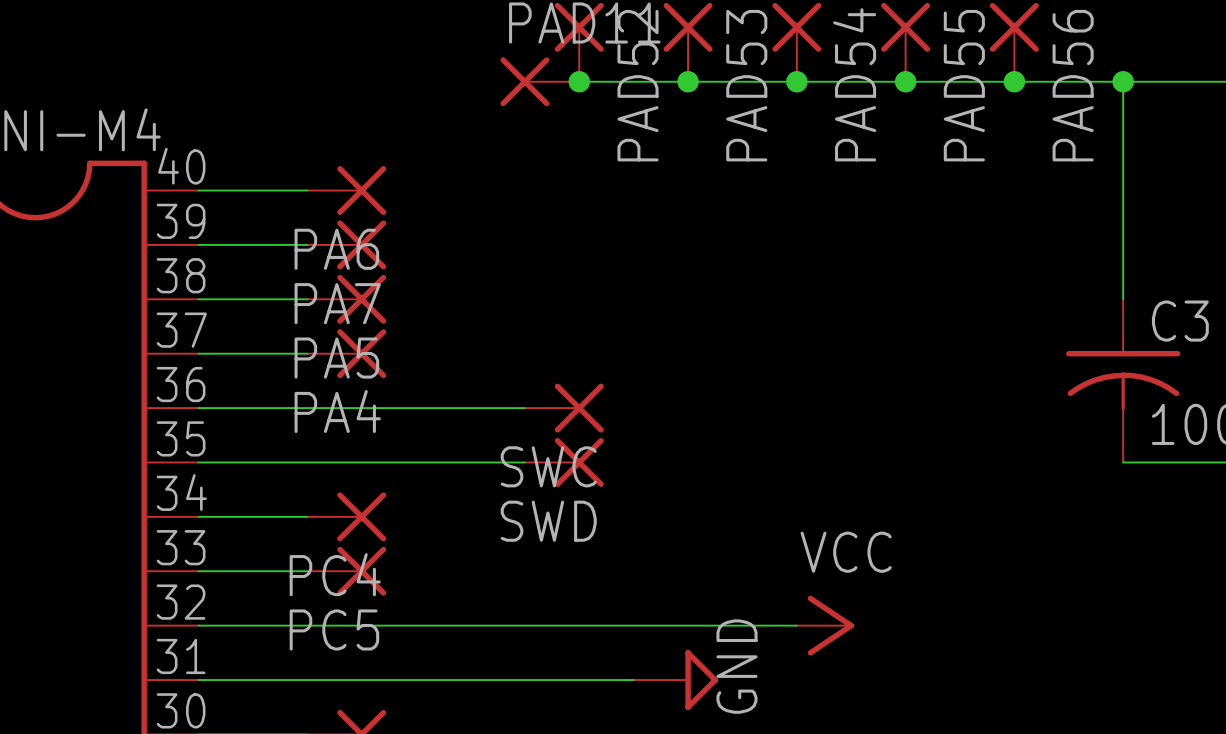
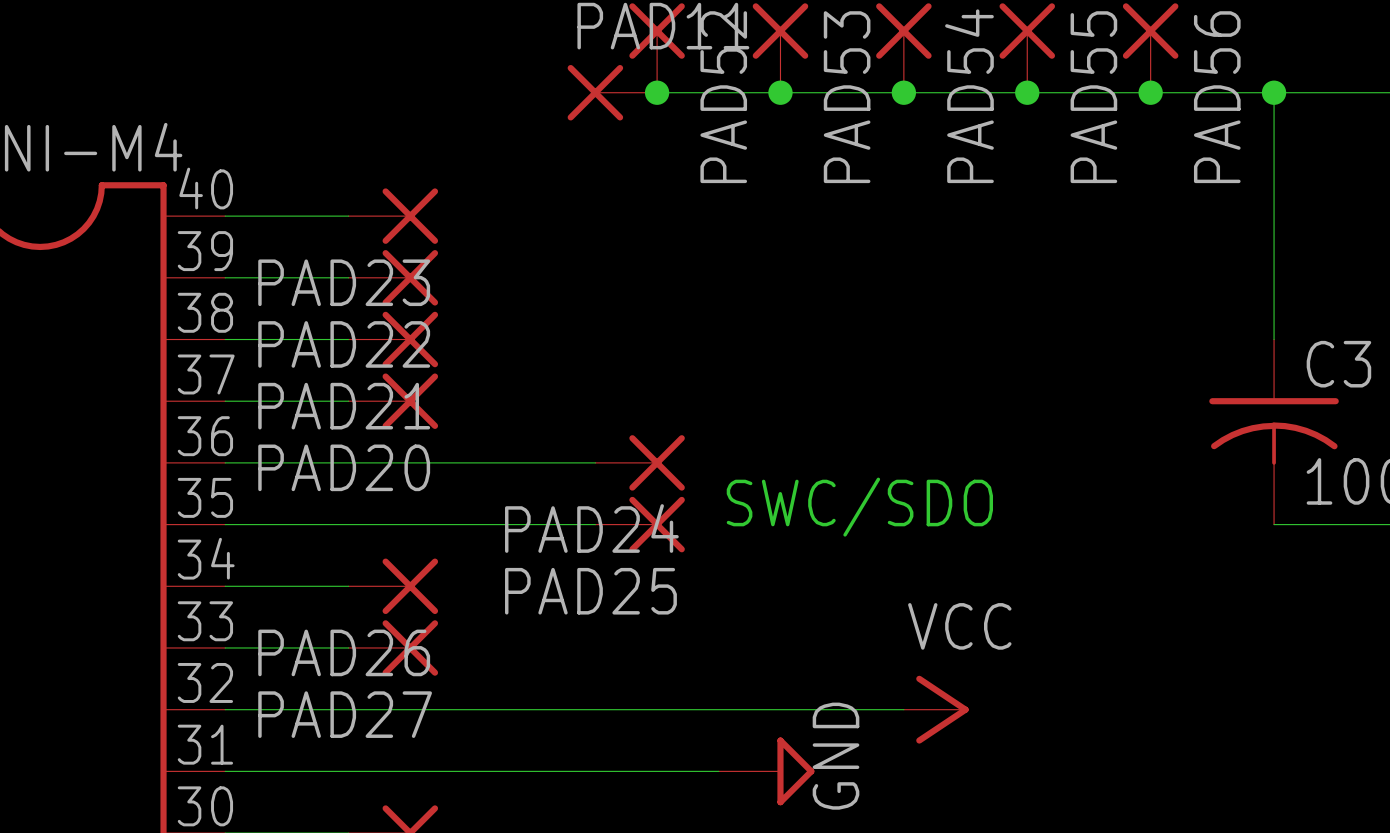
PA6 name: PA6 (336, 249) -> PAD23 (344, 282)
PA7 name: PA7 (337, 303) -> PAD22 (344, 344)
PA5 name: PA5 (336, 358) -> PAD21 (344, 406)
PA4 name: PA4 (337, 411) -> PAD20 (344, 467)
text: none -> SWC/SDO (859, 507)
SWC name: SWC (548, 466) -> PAD24 (591, 528)
SWD name: SWD (548, 521) -> PAD25 (590, 591)
PC4 name: PC4 (335, 574) -> PAD26 (344, 652)
PC5 name: PC5 (334, 629) -> PAD27 (345, 714)

